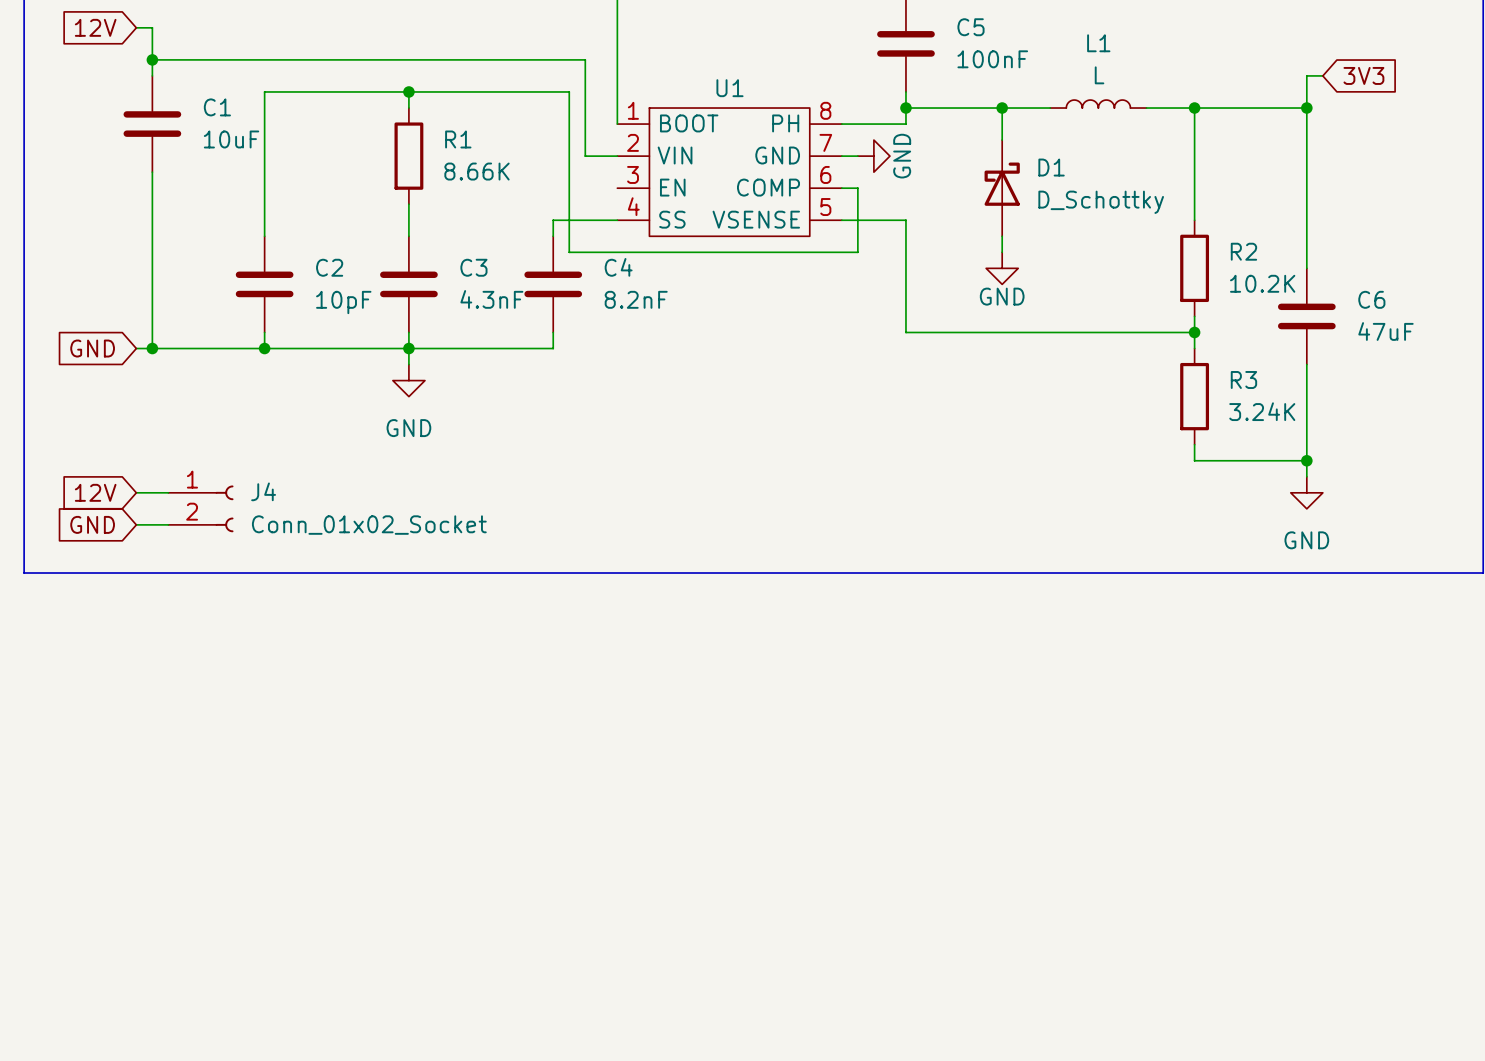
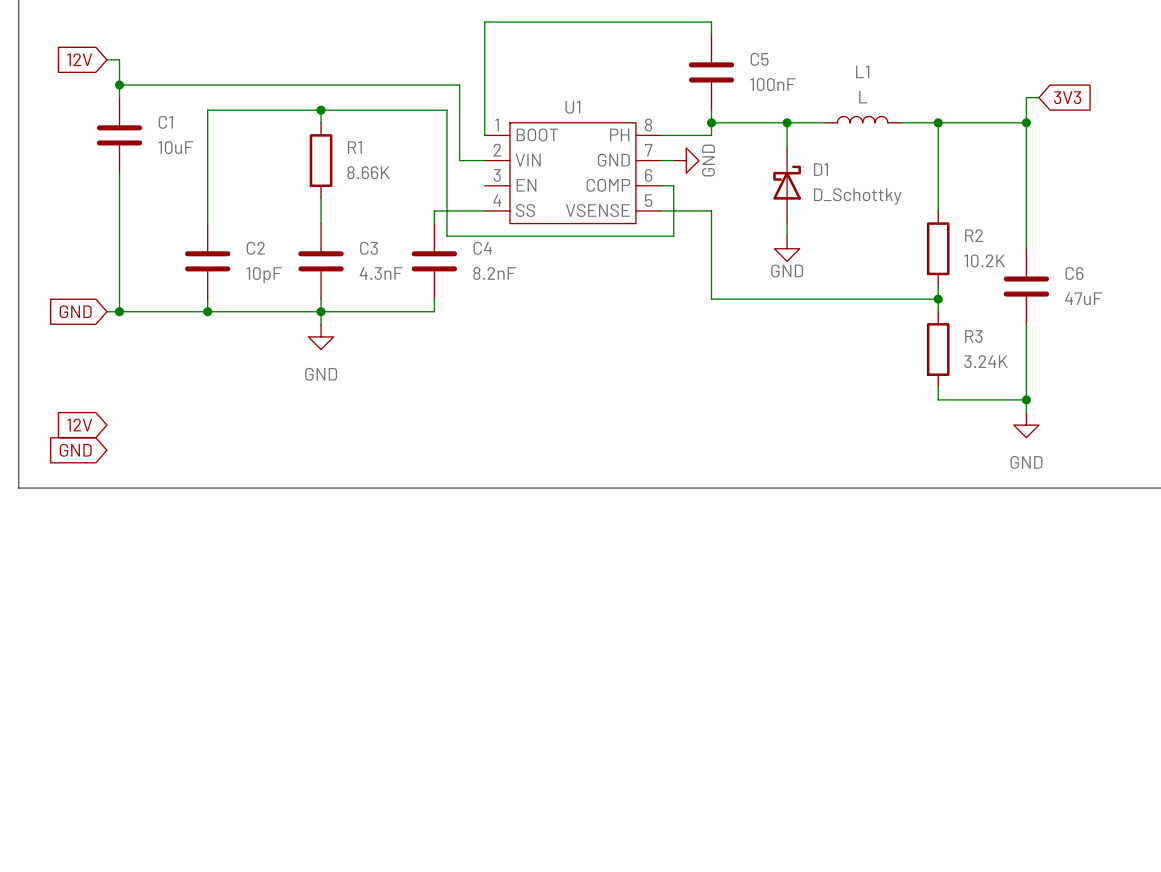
wire: (136, 492) (168, 492) -> none
J4: Conn_01x02_Socket (200, 508) -> none
wire: (136, 524) (168, 524) -> none

